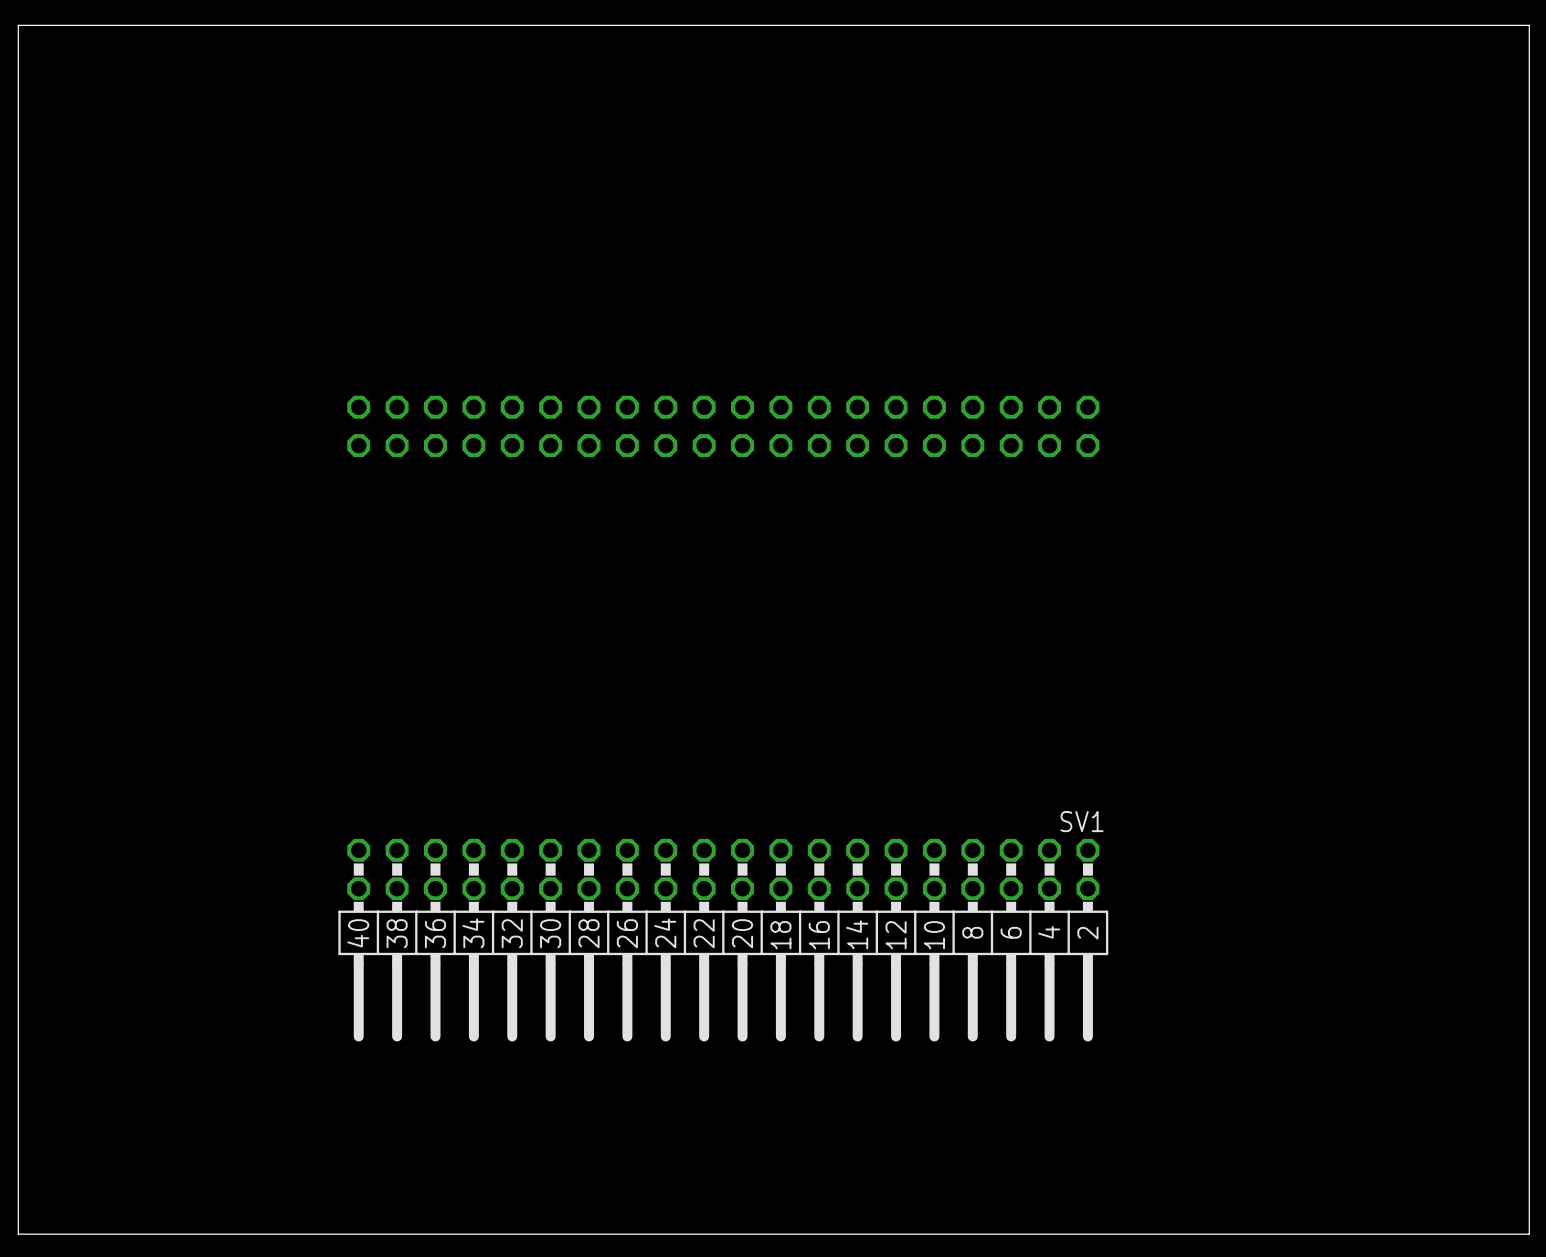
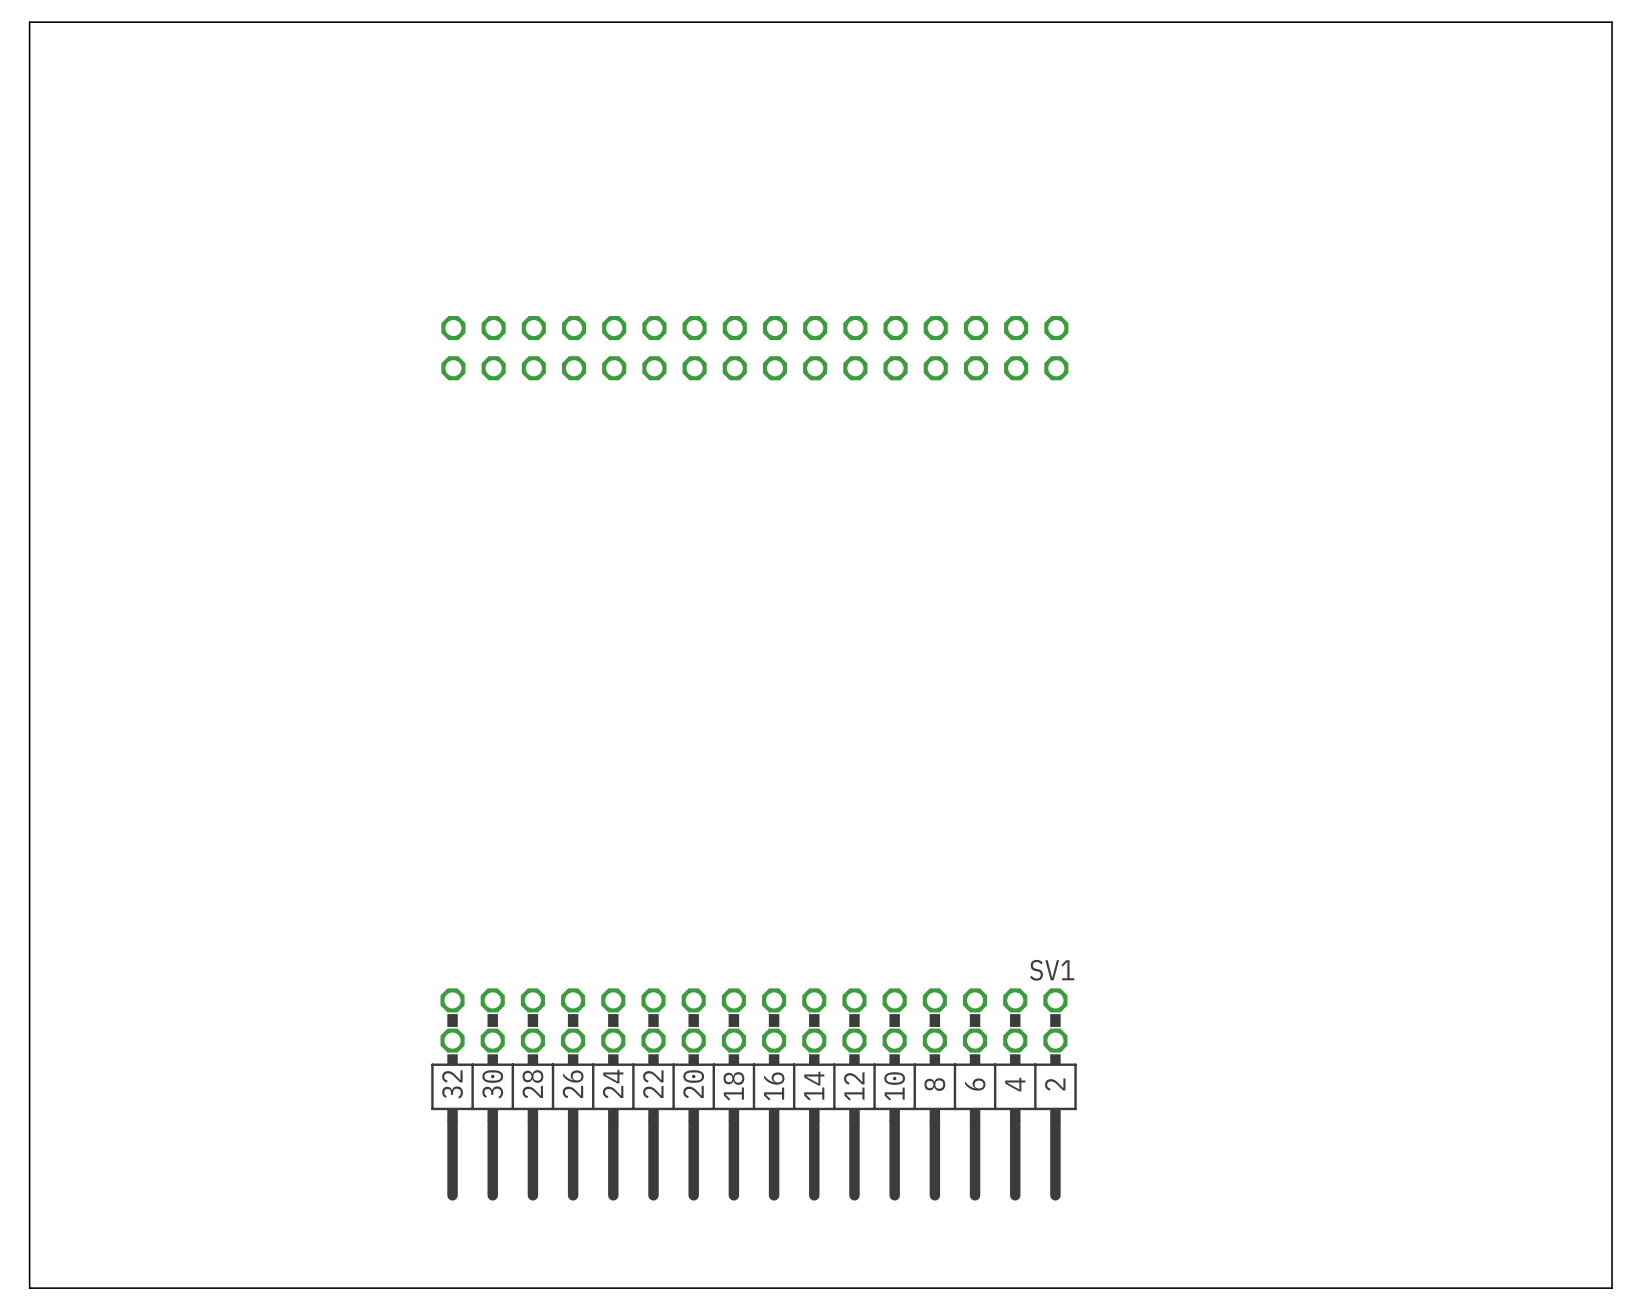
part: none -> (754, 348)
part: (723, 426) -> none
SV1 name position: SV1 (1082, 821) -> SV1 (1052, 970)
SV1 footprint: [338, 838, 1109, 1042] -> [431, 988, 1077, 1201]

